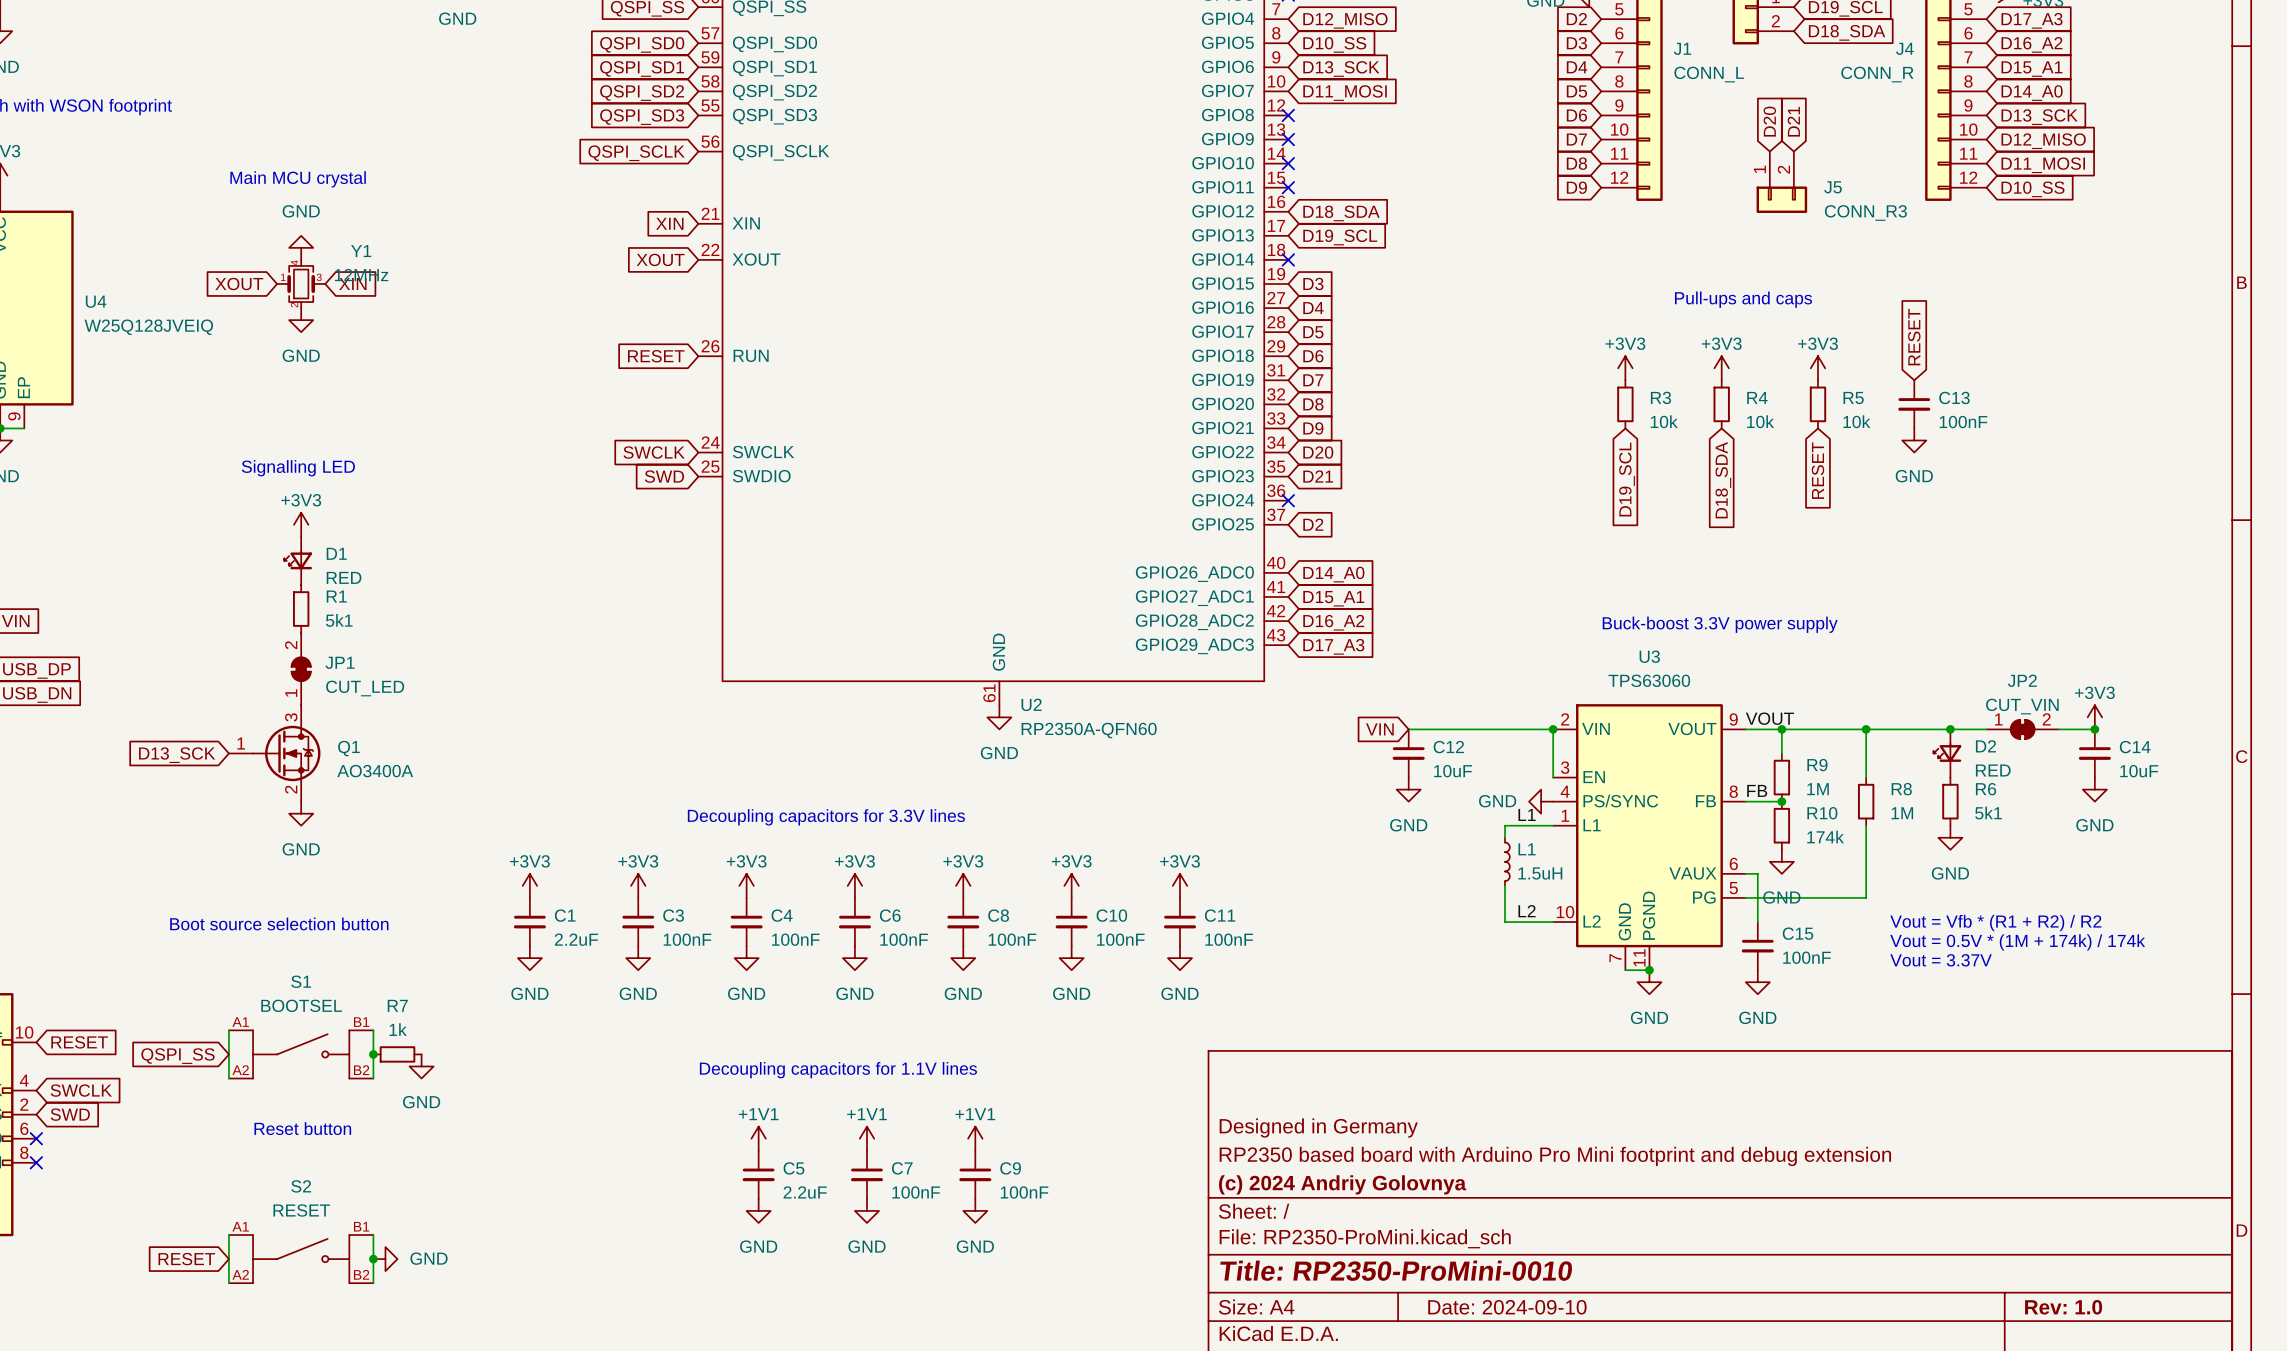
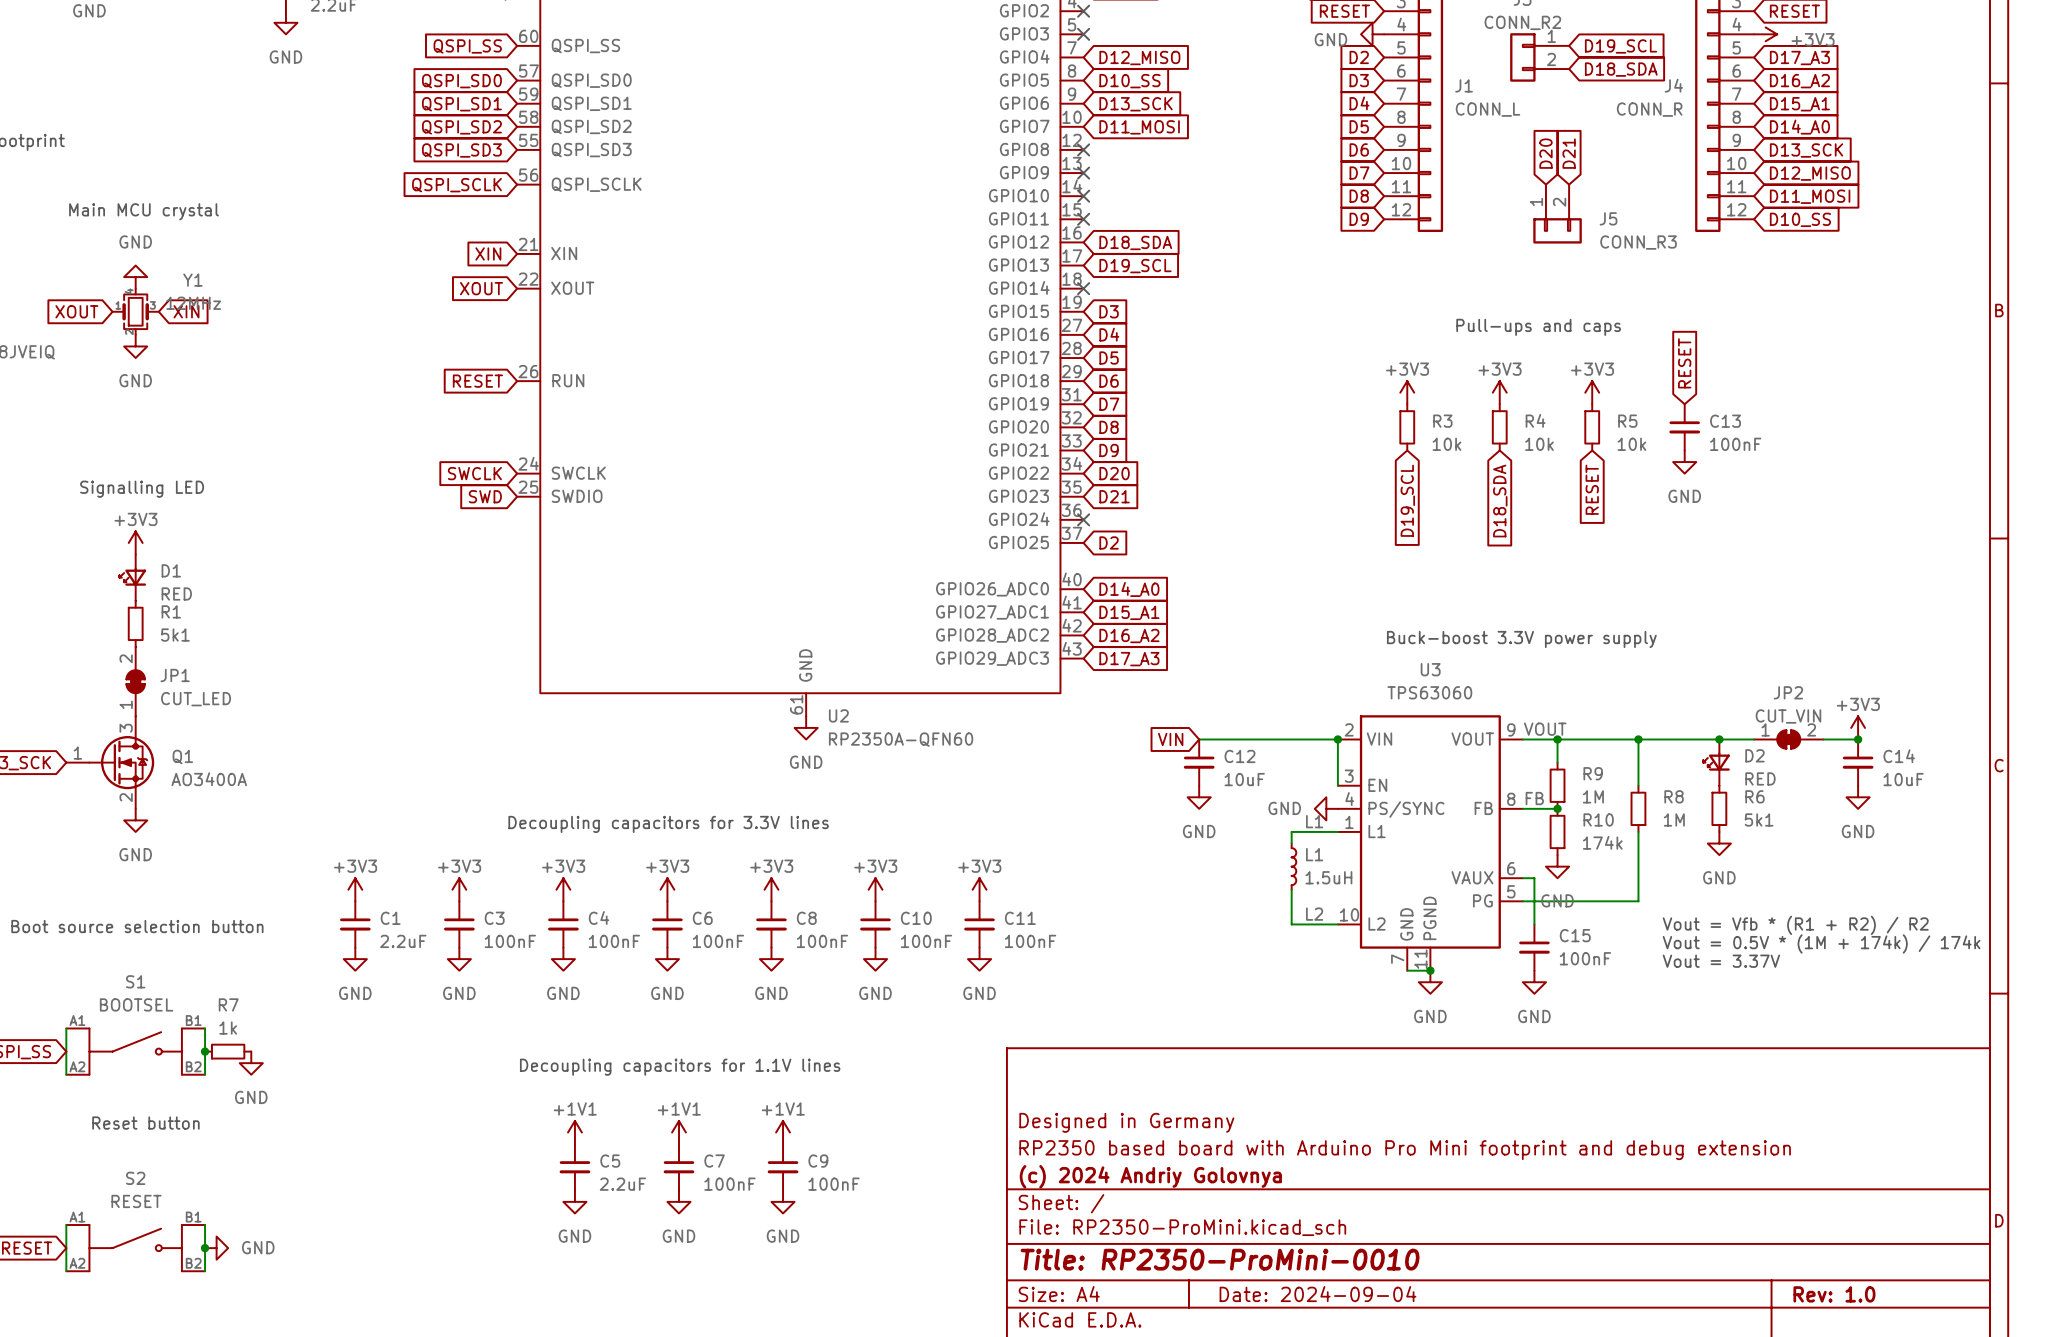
title block: Date: 2024-09-10 (1507, 1307) -> Date: 2024-09-04 (1317, 1294)

